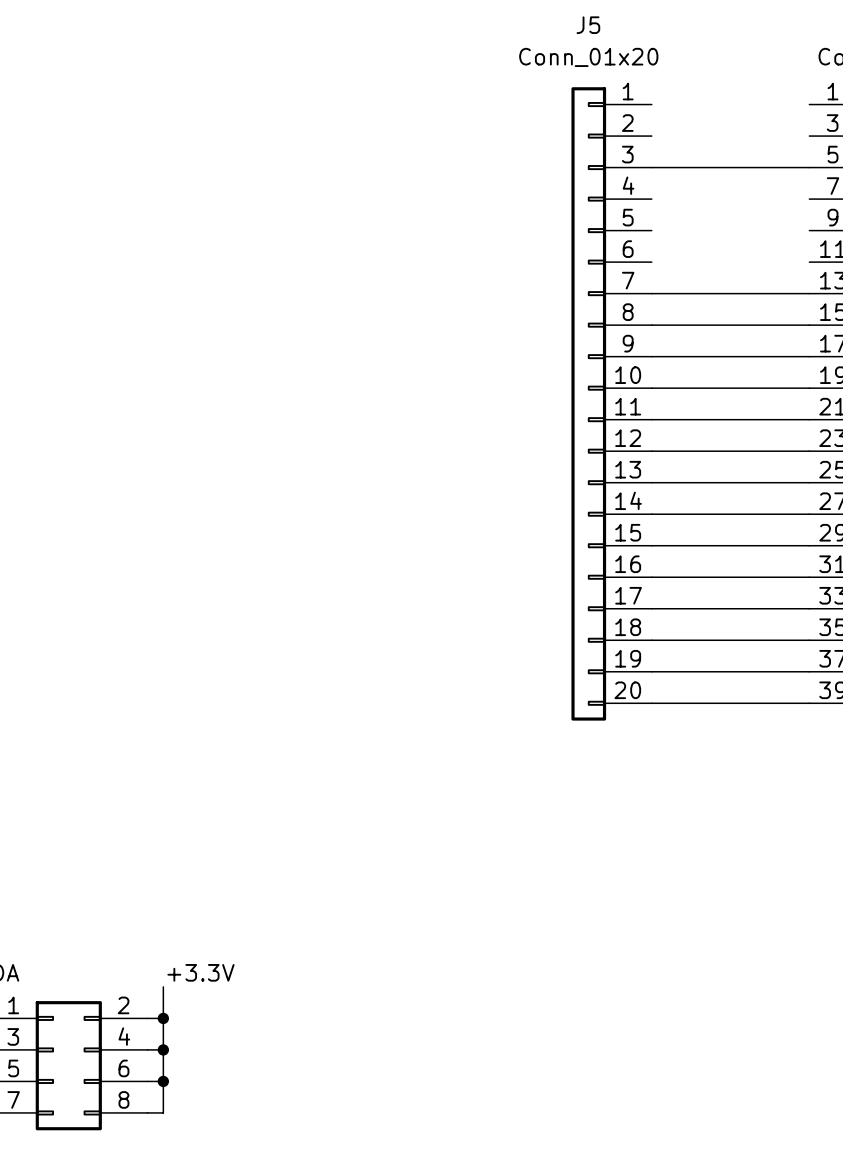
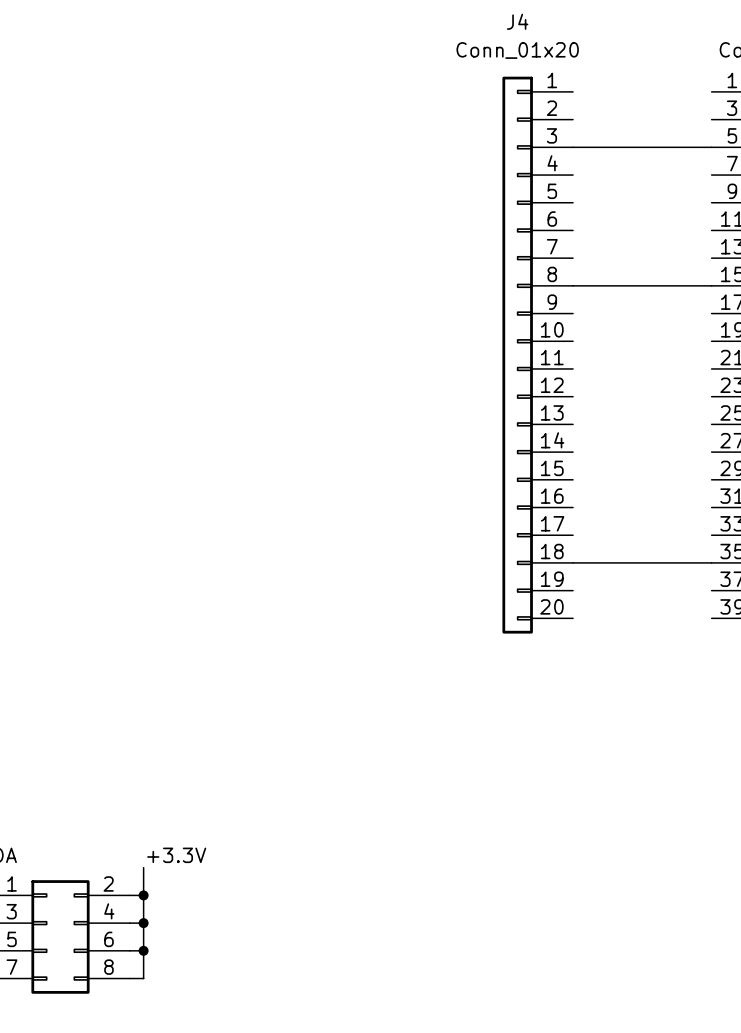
J5 name: J5 (588, 25) -> J4 (517, 21)
wire: (651, 293) (809, 293) -> none
wire: (651, 356) (809, 356) -> none
wire: (651, 388) (809, 388) -> none
wire: (651, 419) (809, 419) -> none
wire: (651, 451) (809, 451) -> none
wire: (651, 482) (809, 482) -> none
wire: (651, 514) (809, 514) -> none
wire: (651, 545) (809, 545) -> none
wire: (651, 577) (809, 577) -> none
wire: (651, 608) (809, 608) -> none
wire: (651, 671) (809, 671) -> none
wire: (651, 703) (809, 703) -> none

